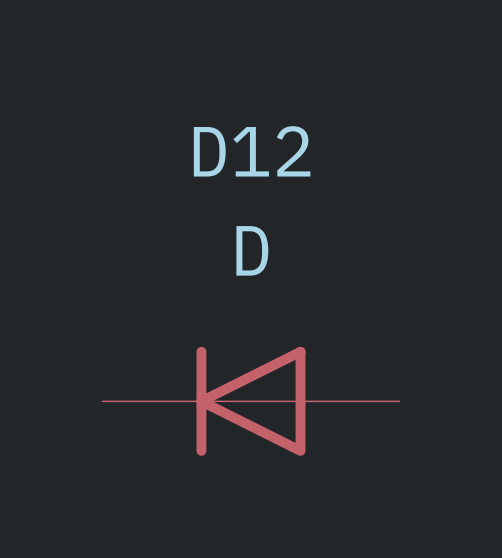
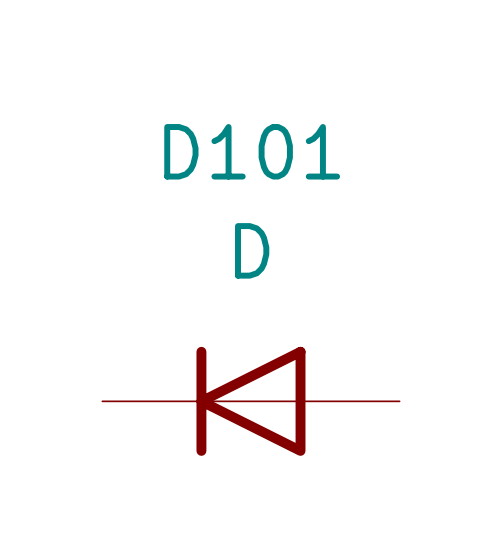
D12 name: D12 (252, 151) -> D101 (252, 151)

